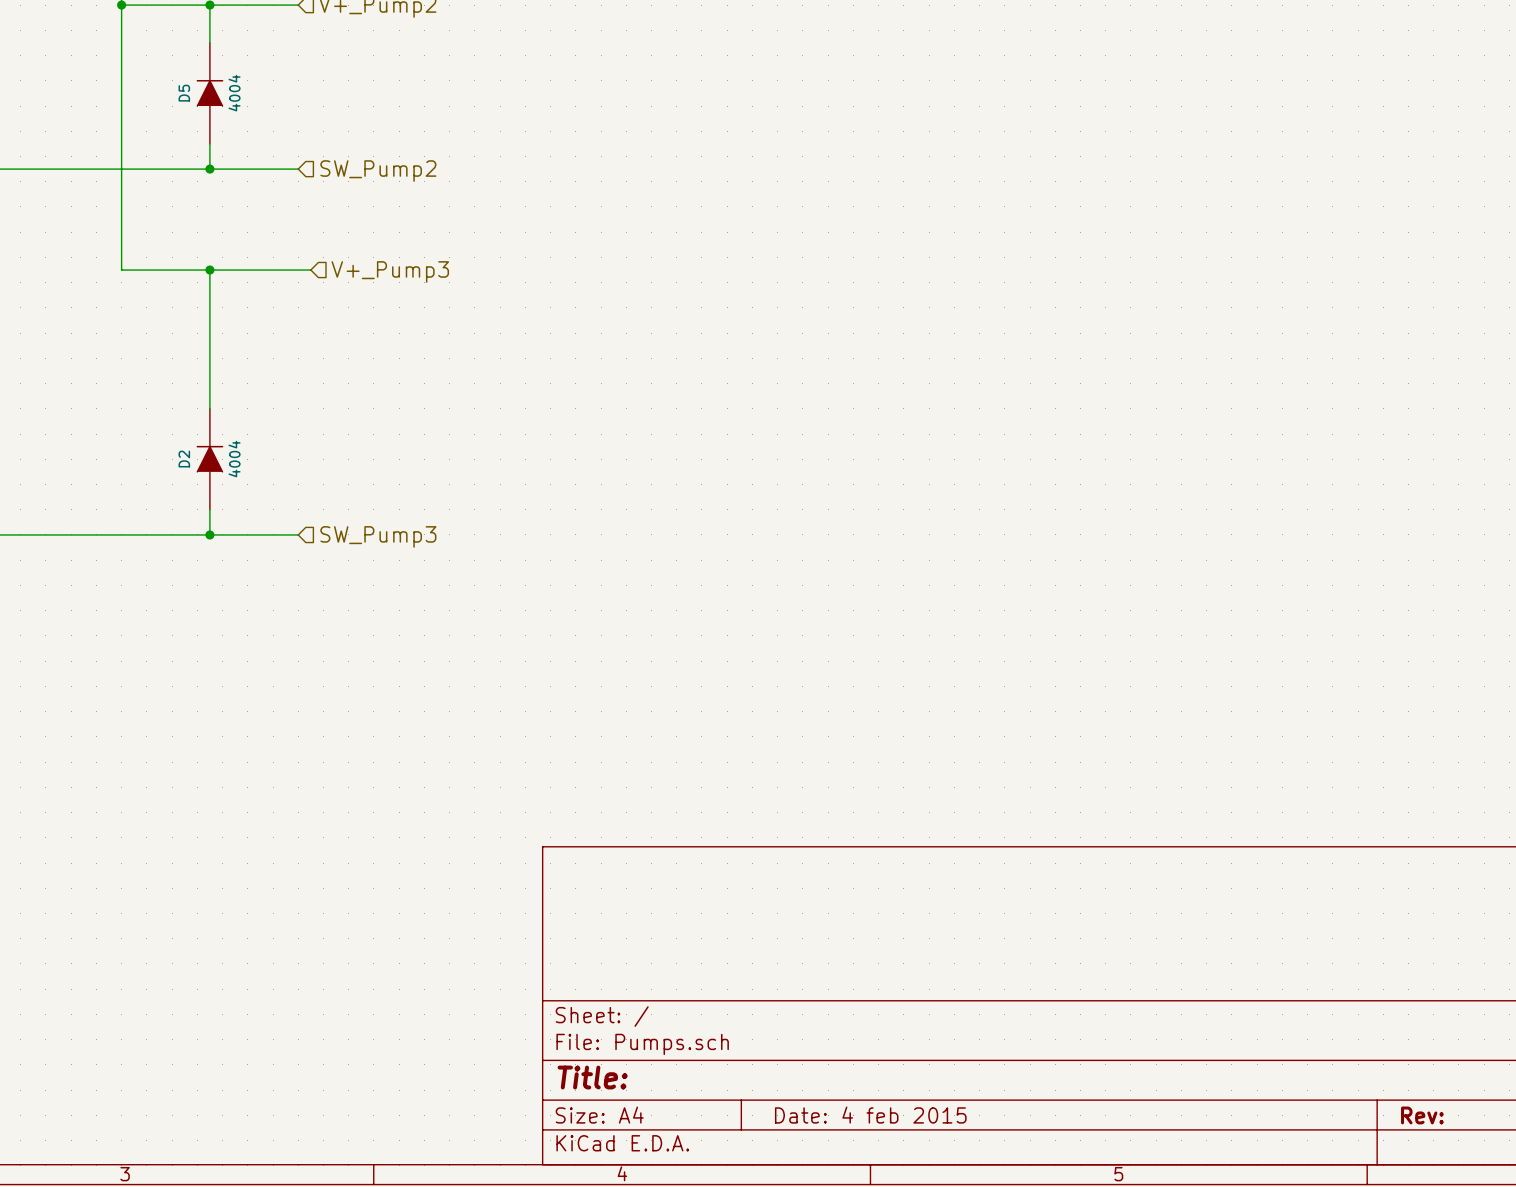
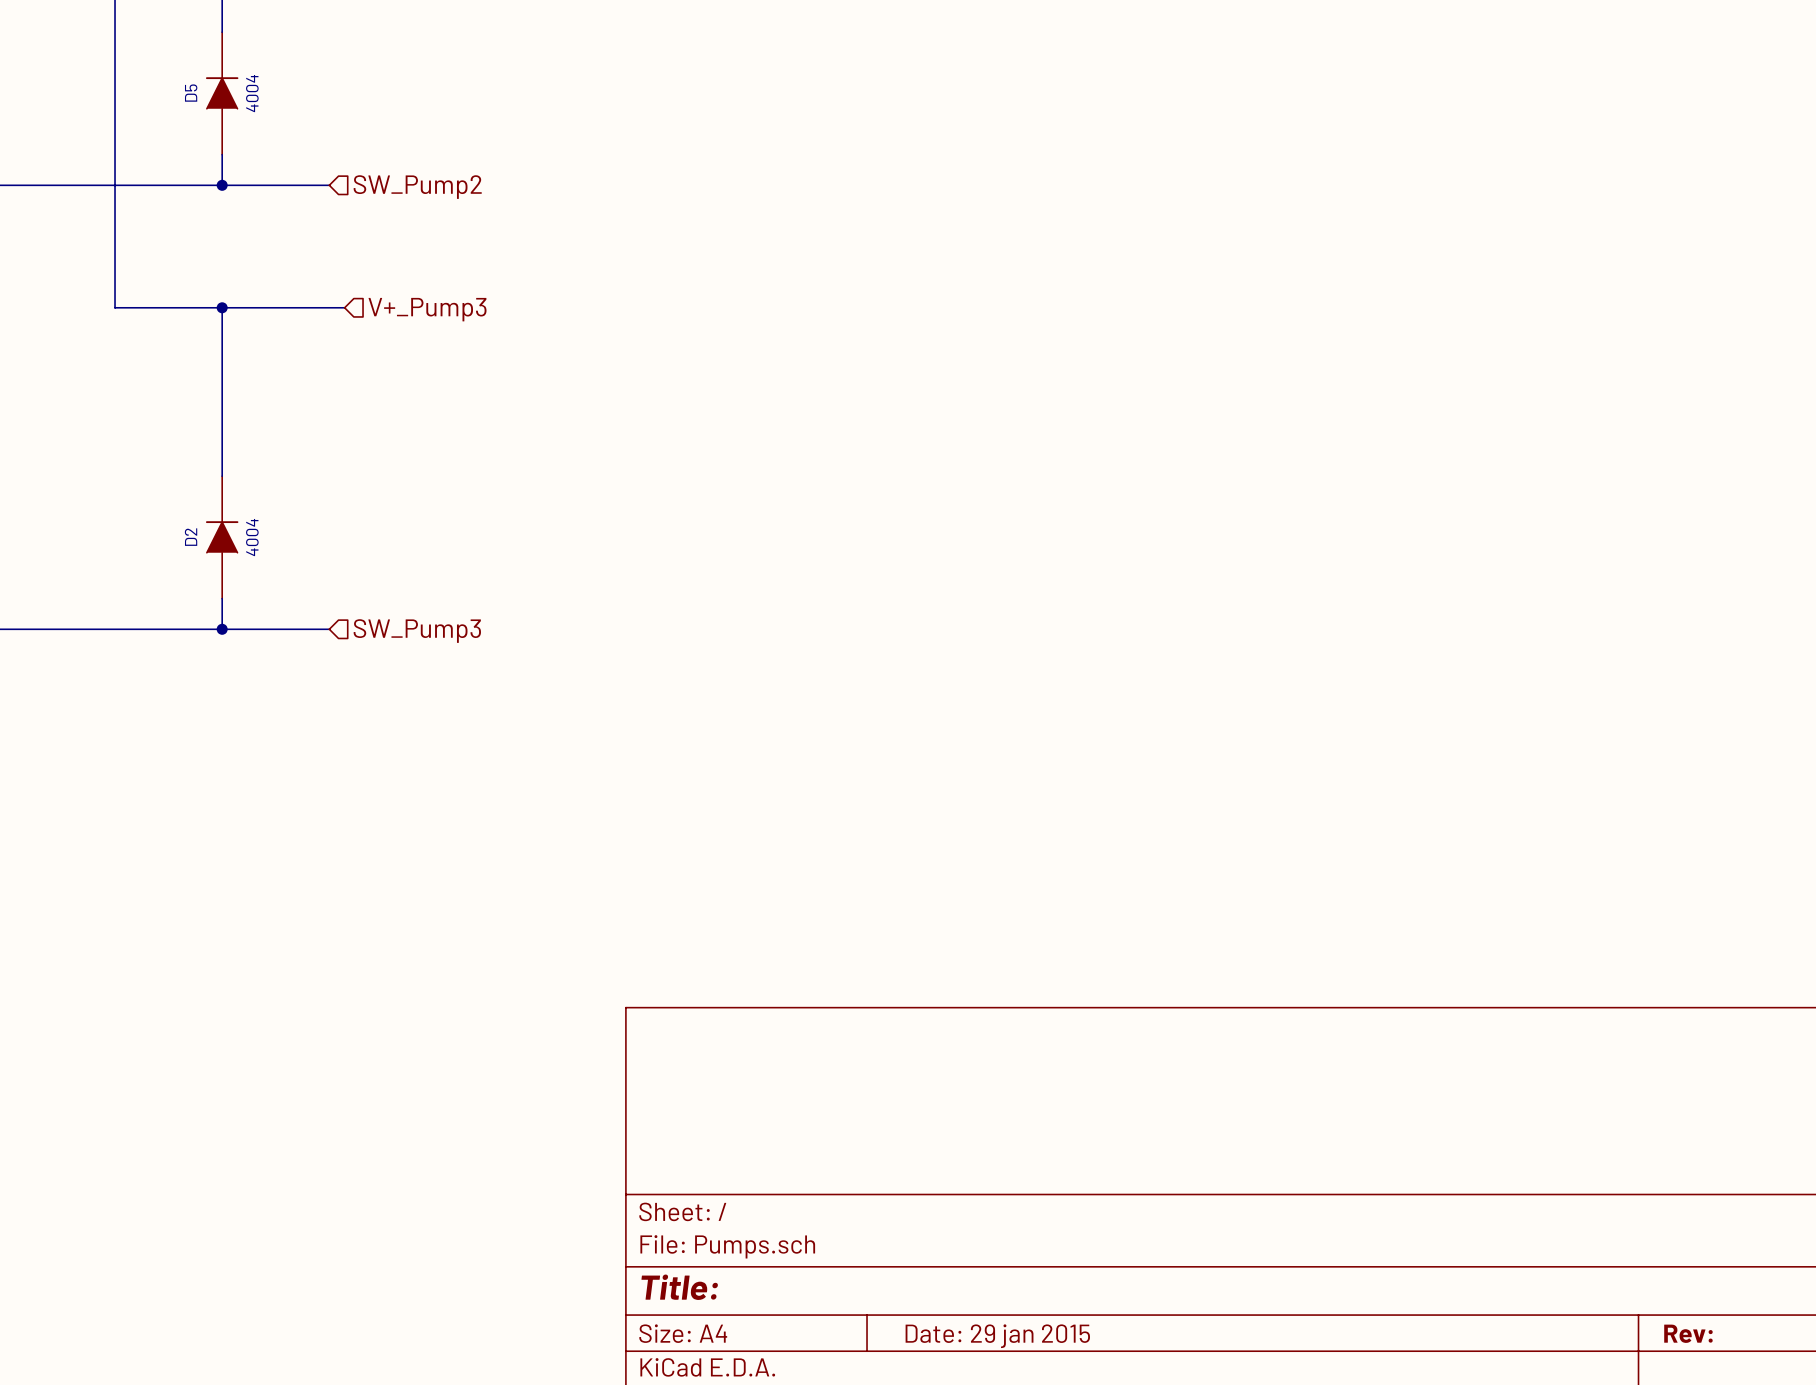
title block: Date: 4 feb 2015 (870, 1115) -> Date: 29 jan 2015 (997, 1336)

